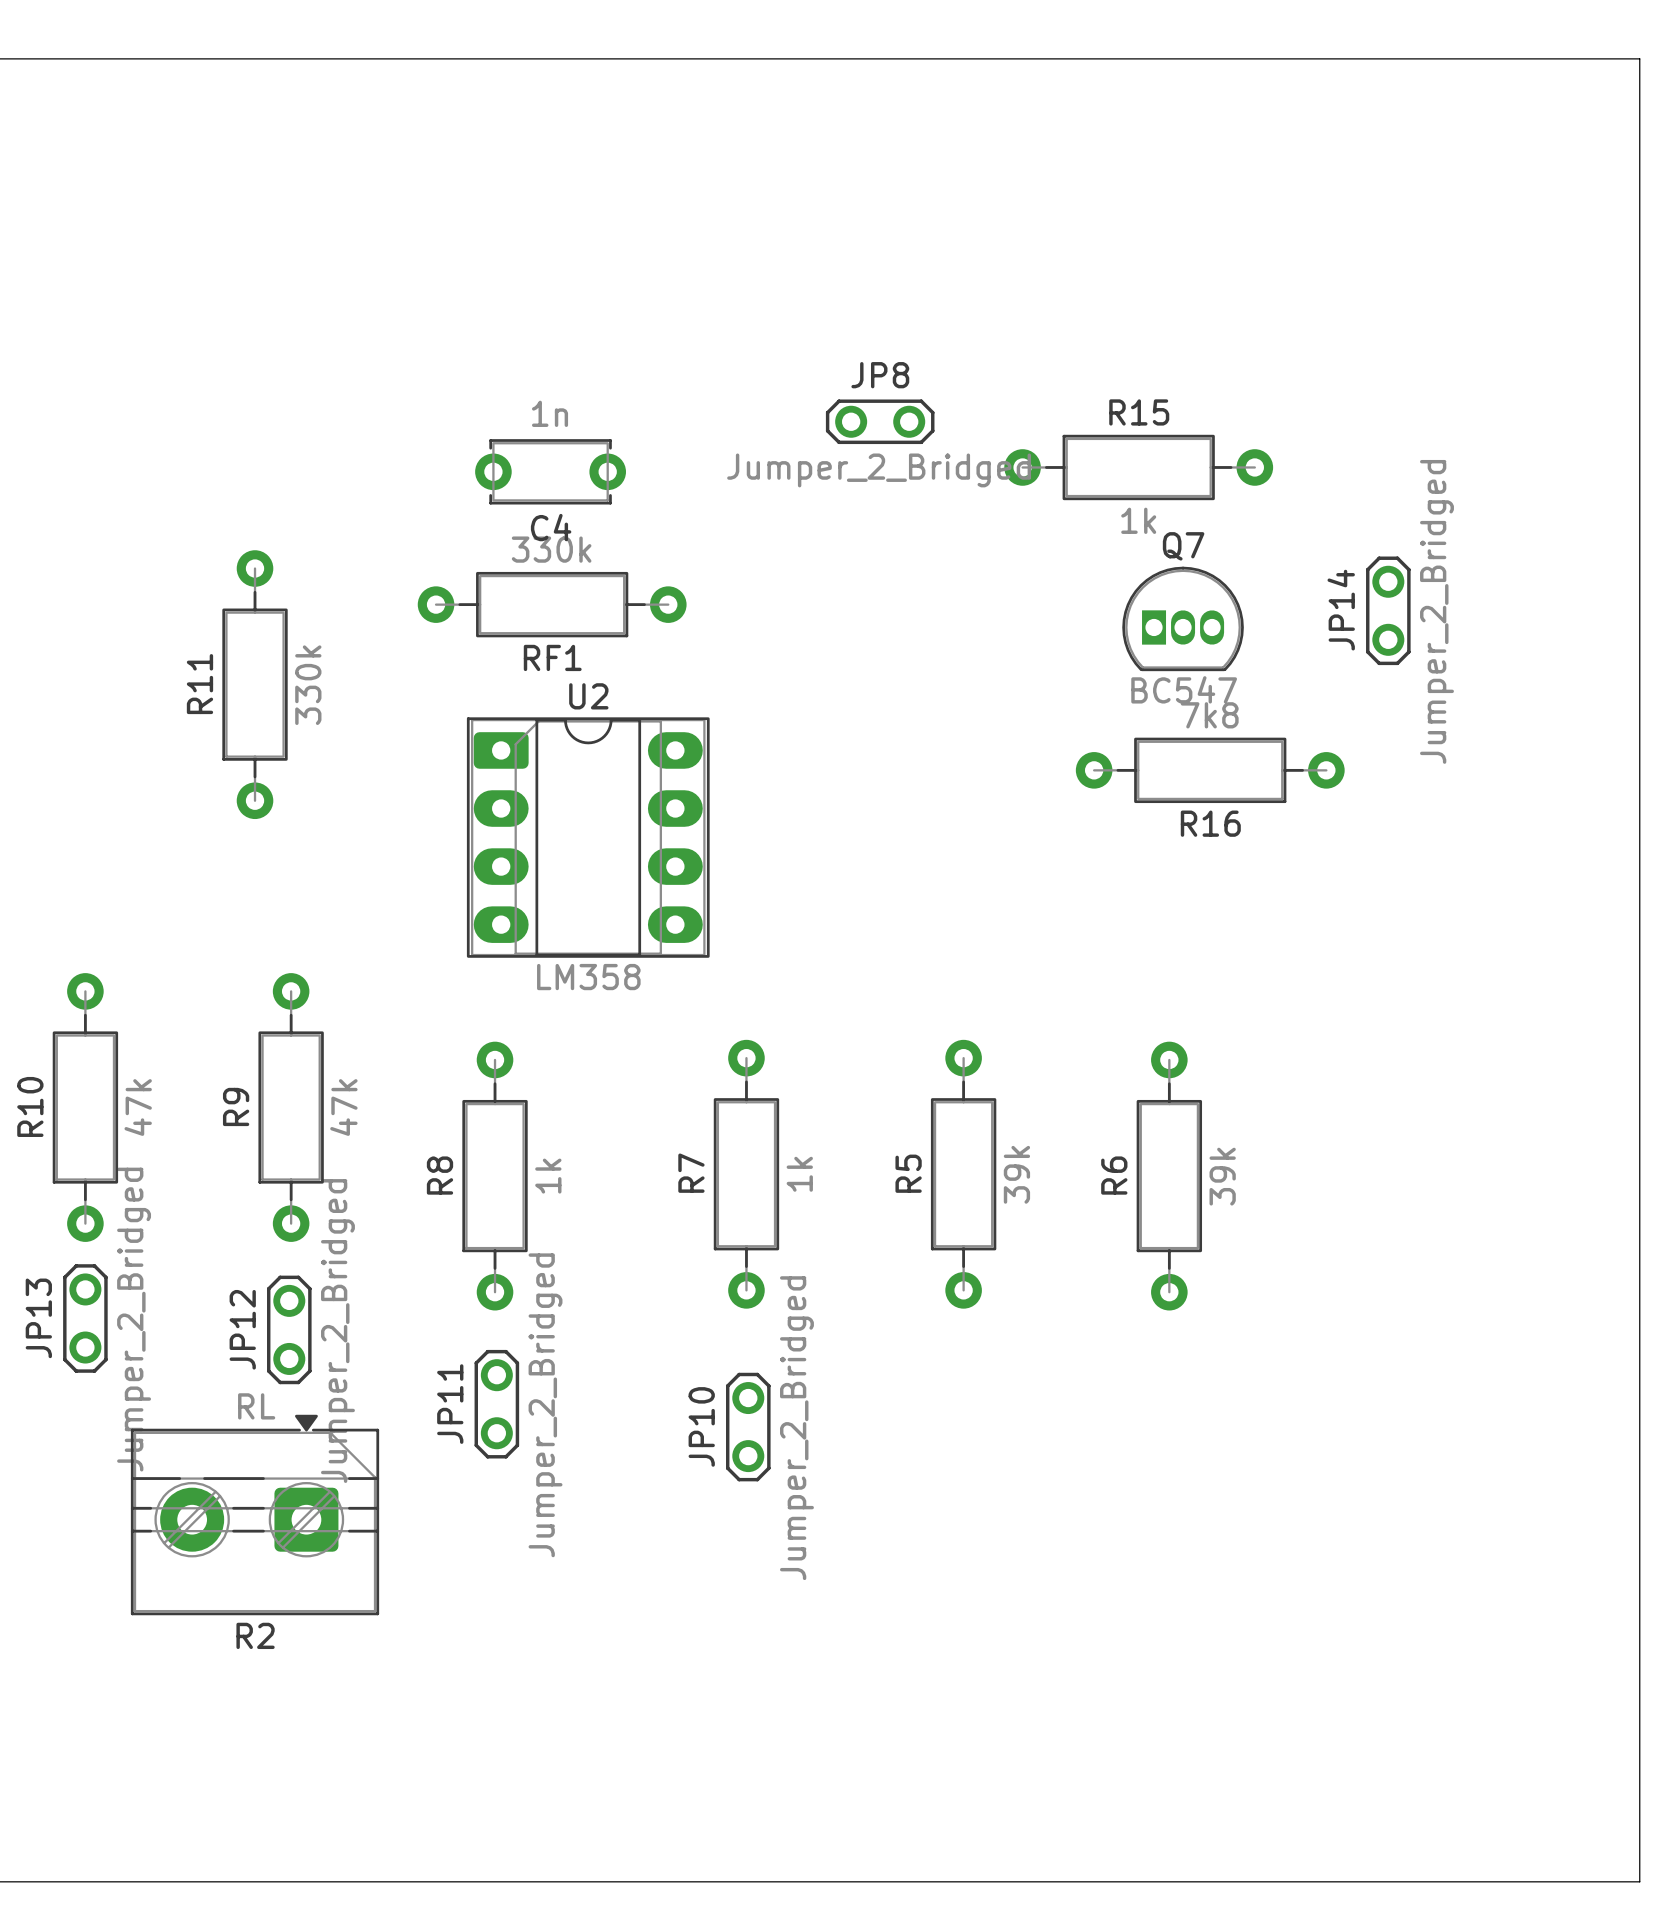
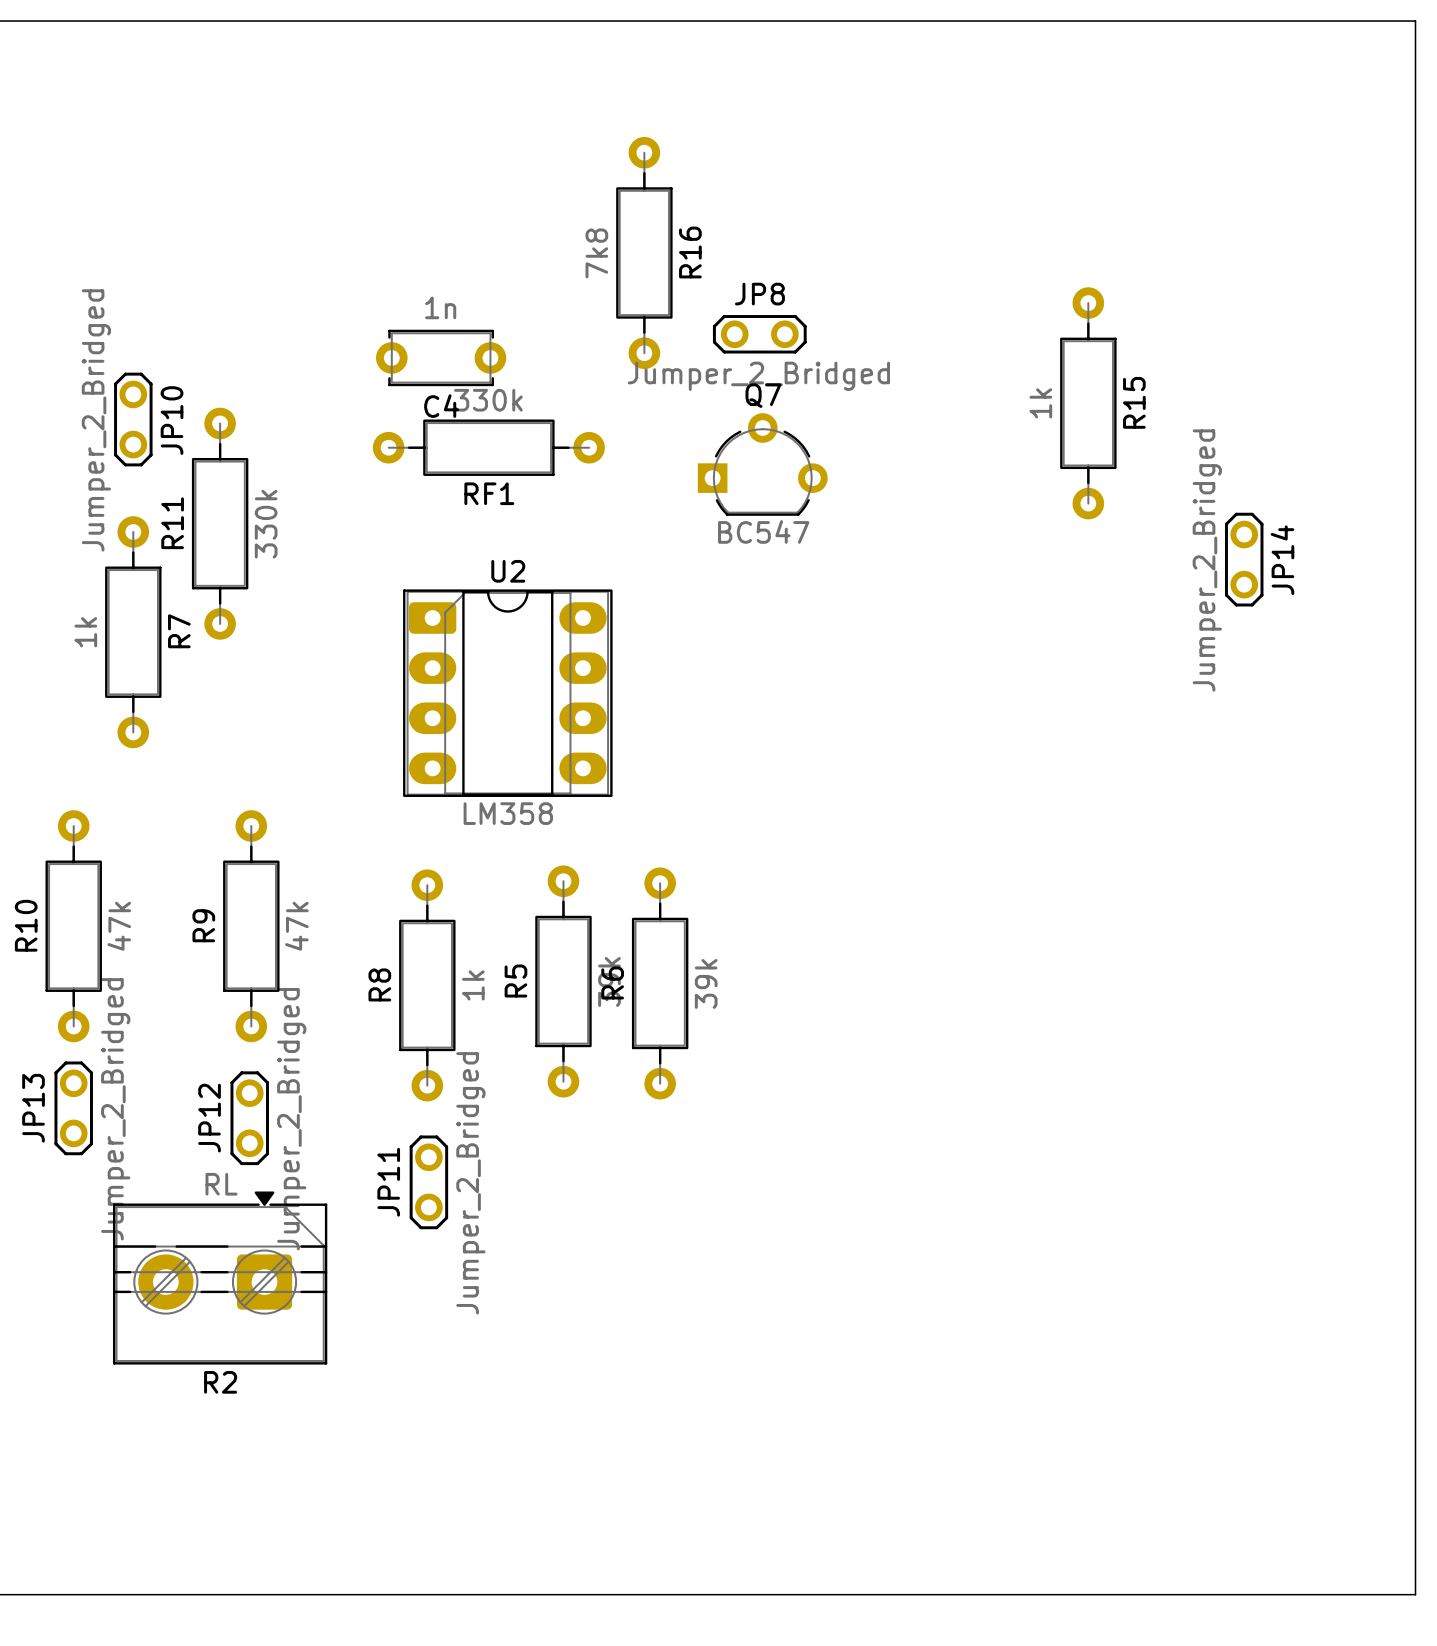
R15 rotation: 0° (1138, 467) -> 90° clockwise (1088, 403)
C4 position: (550, 471) -> (441, 357)
Q7 footprint: [1122, 566, 1244, 672] -> [697, 413, 828, 516]
RF1 position: (552, 604) -> (488, 447)
JP14 name position: JP14 (1341, 610) -> JP14 (1282, 560)
JP14 position: (1388, 610) -> (1244, 559)
JP14 value position: Jumper_2_Bridged (1436, 611) -> Jumper_2_Bridged (1207, 560)
R11 position: (255, 684) -> (220, 523)
R16 value position: 7k8 (1209, 715) -> 7k8 (596, 253)
R16 rotation: 0° (1210, 770) -> 90° clockwise (644, 252)
R16 position: (1210, 770) -> (644, 252)
R16 name position: R16 (1210, 823) -> R16 (690, 252)
R7 name position: R7 (691, 1173) -> R7 (179, 631)
R7 position: (746, 1174) -> (133, 632)
R7 value position: 1k (799, 1174) -> 1k (85, 632)
R5 position: (963, 1174) -> (563, 981)
R6 position: (1169, 1176) -> (660, 983)
JP10 name position: JP10 (701, 1426) -> JP10 (172, 420)
JP10 position: (748, 1427) -> (133, 419)
JP10 value position: Jumper_2_Bridged (796, 1428) -> Jumper_2_Bridged (96, 420)

